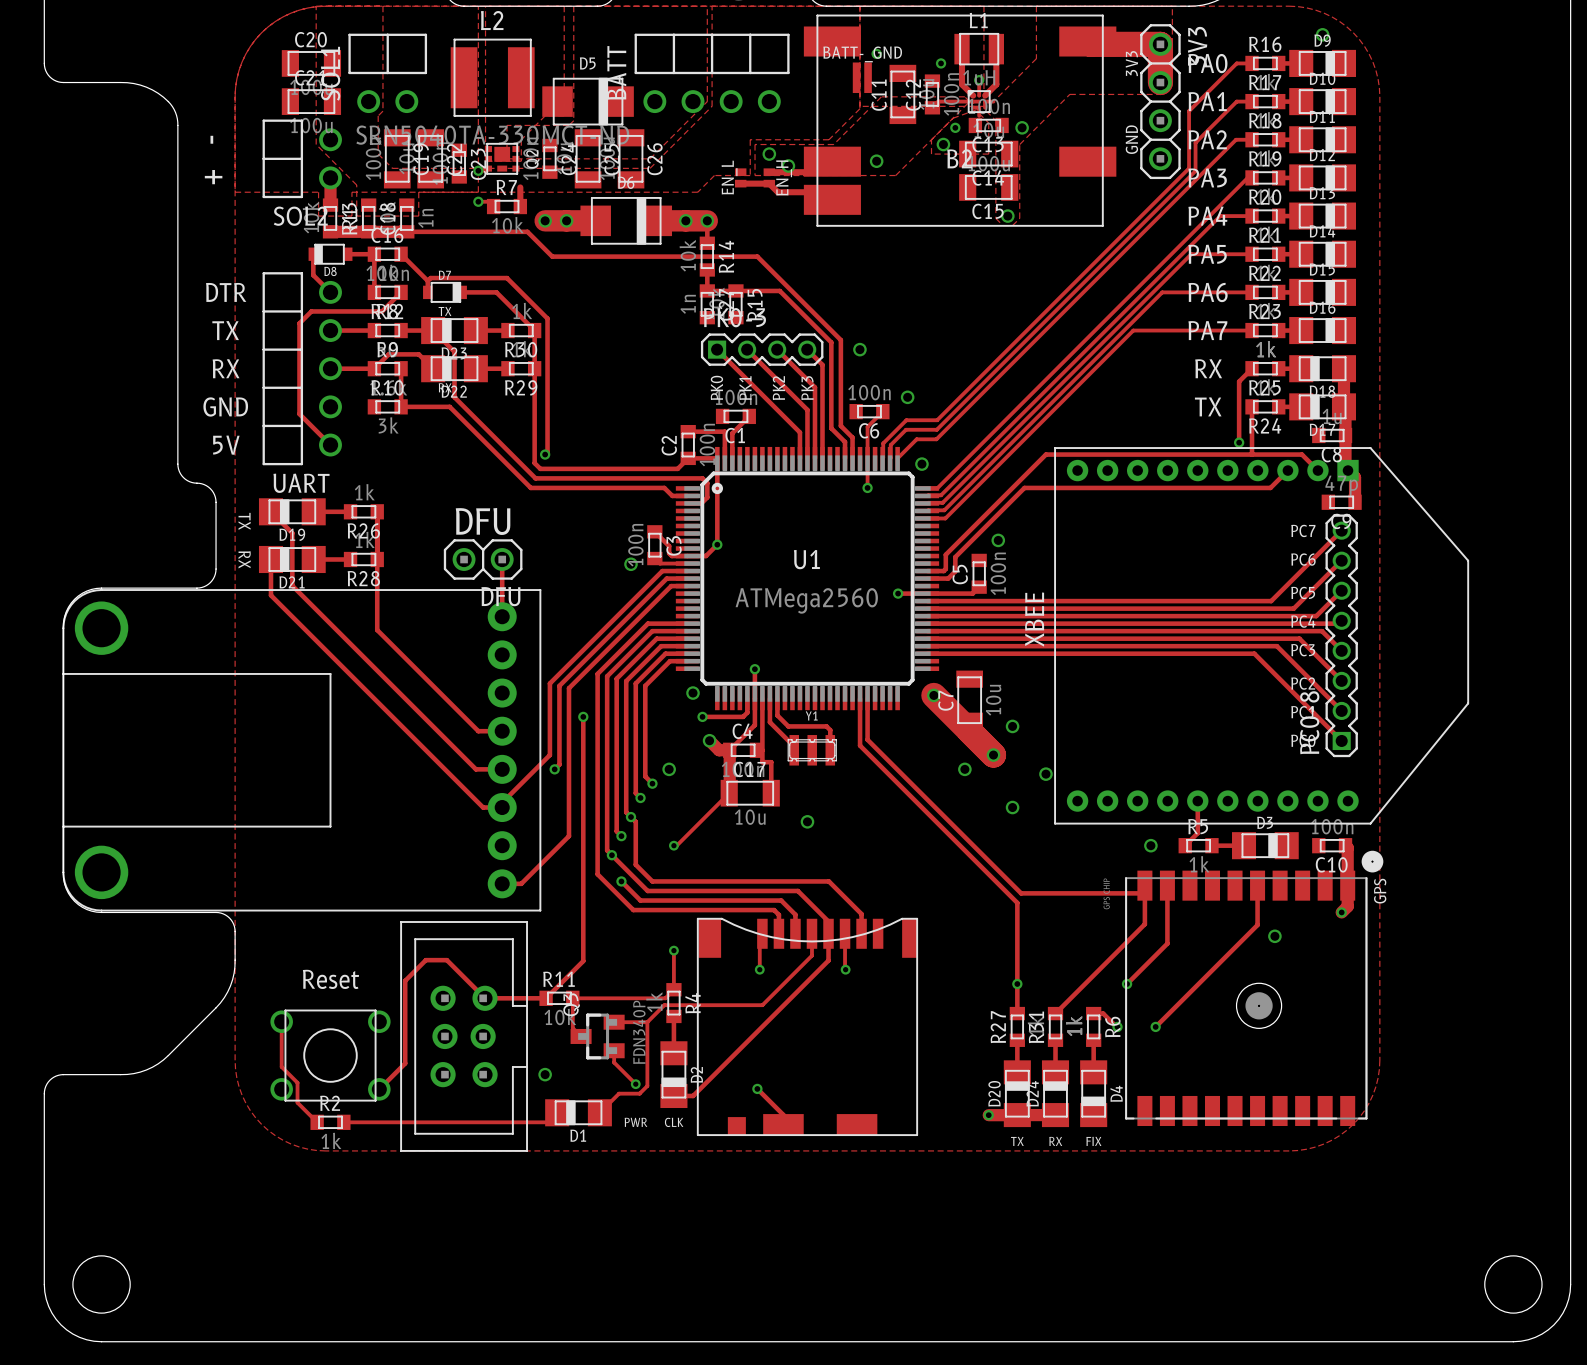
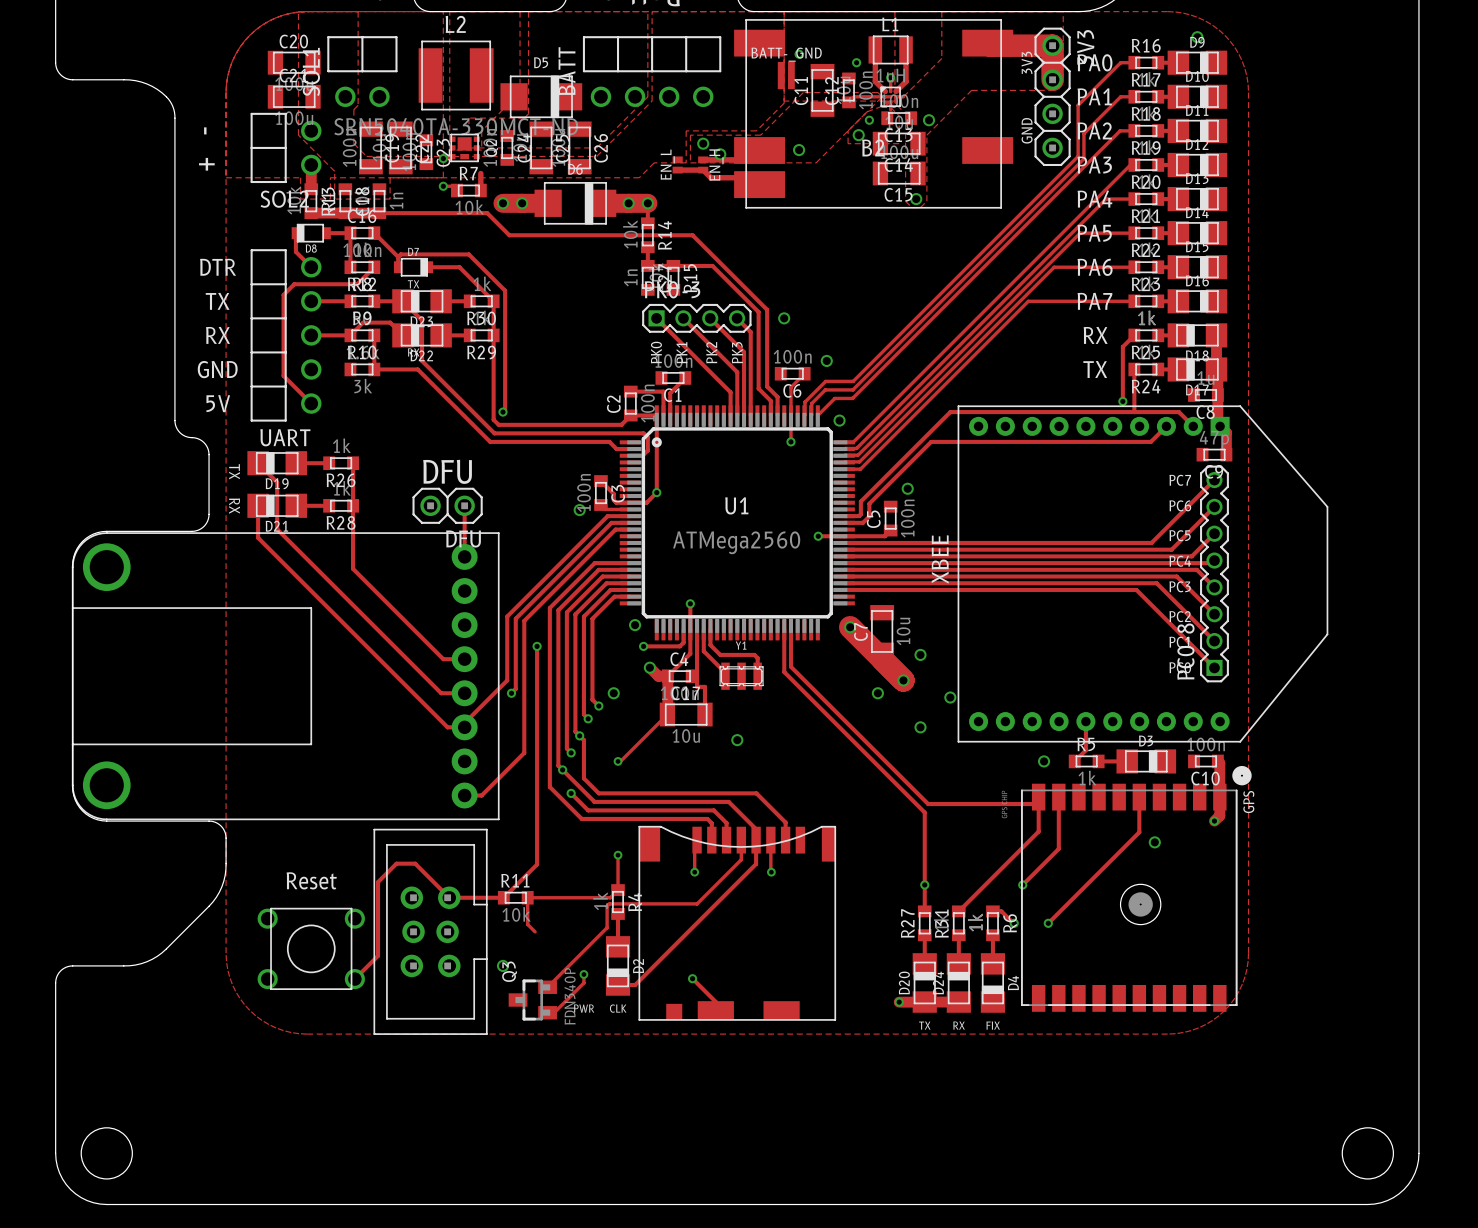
track: (661, 1007) (647, 1022) -> (607, 906) (607, 927) (547, 987)
track: (281, 1021) (281, 1066) (297, 1082) (297, 1102) (317, 1122) -> none
track: (614, 1022) (647, 1022) -> none
track: (647, 1022) (647, 1085) (639, 1093) (619, 1093) (599, 1112) -> none
Q3 position: (597, 1036) -> (532, 1000)
track: (614, 1050) (614, 1062) (635, 1084) -> (547, 1012) (554, 1012) (583, 982) (583, 974)
track: (557, 1112) (547, 1122) (343, 1122) -> none
D1: (578, 1112) -> none
R2: 1k (330, 1122) -> none

